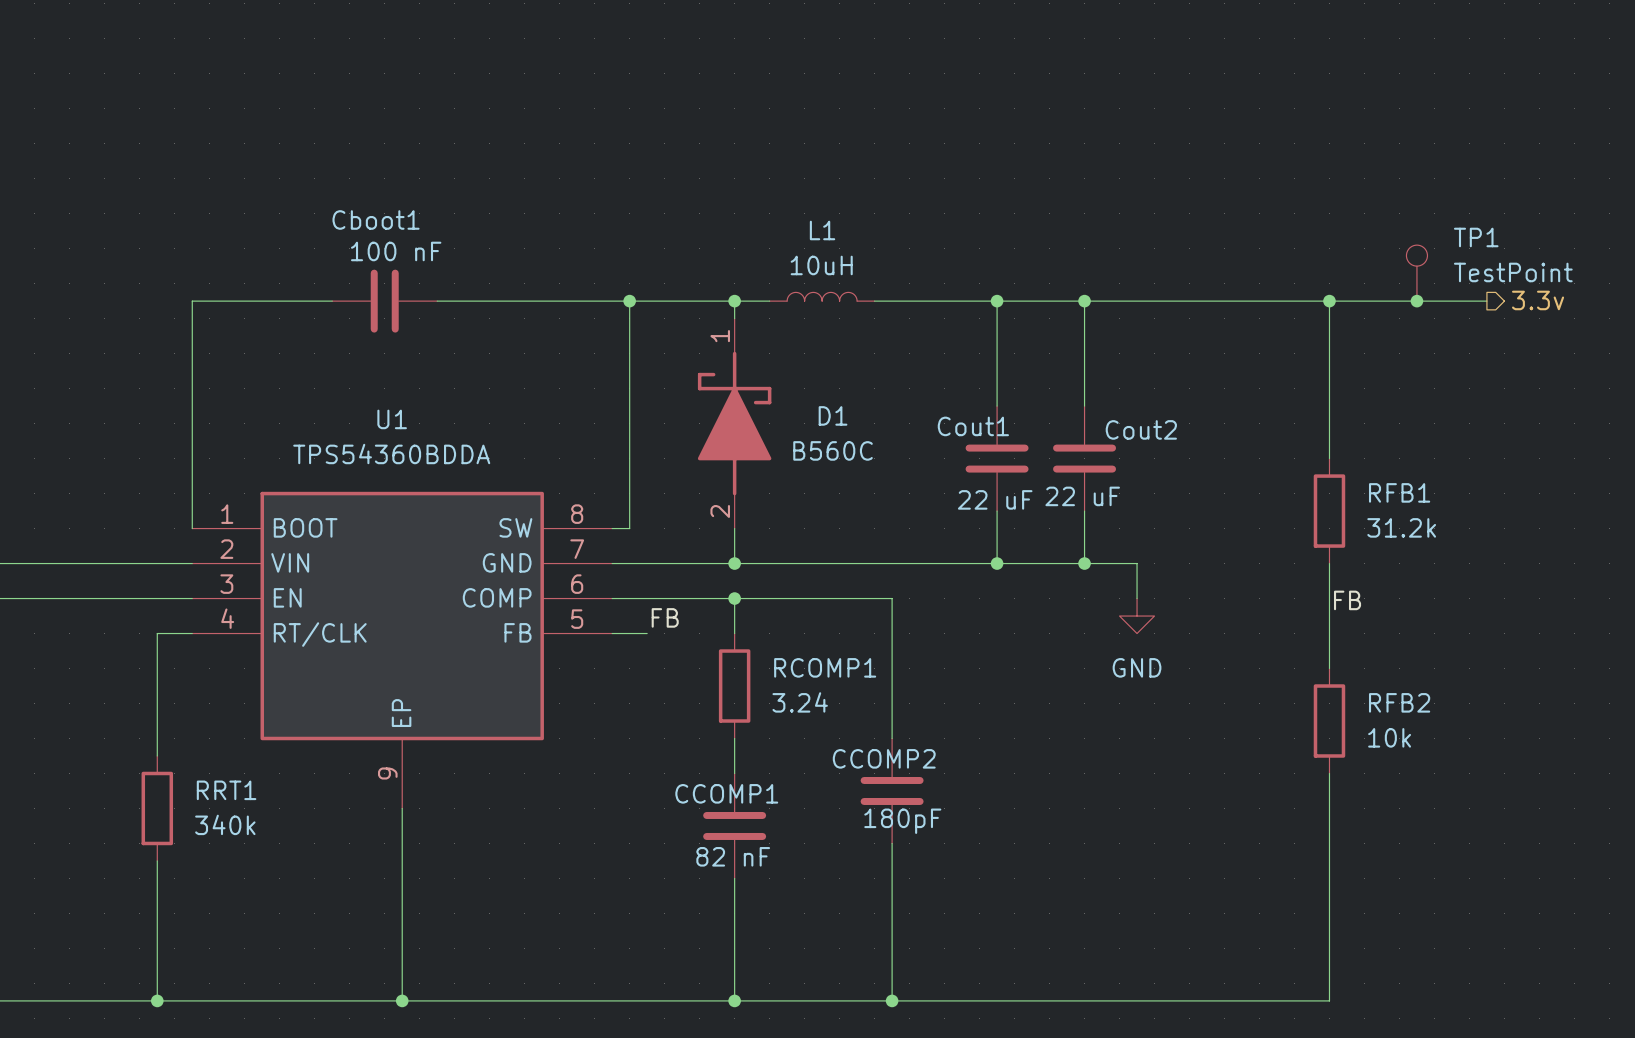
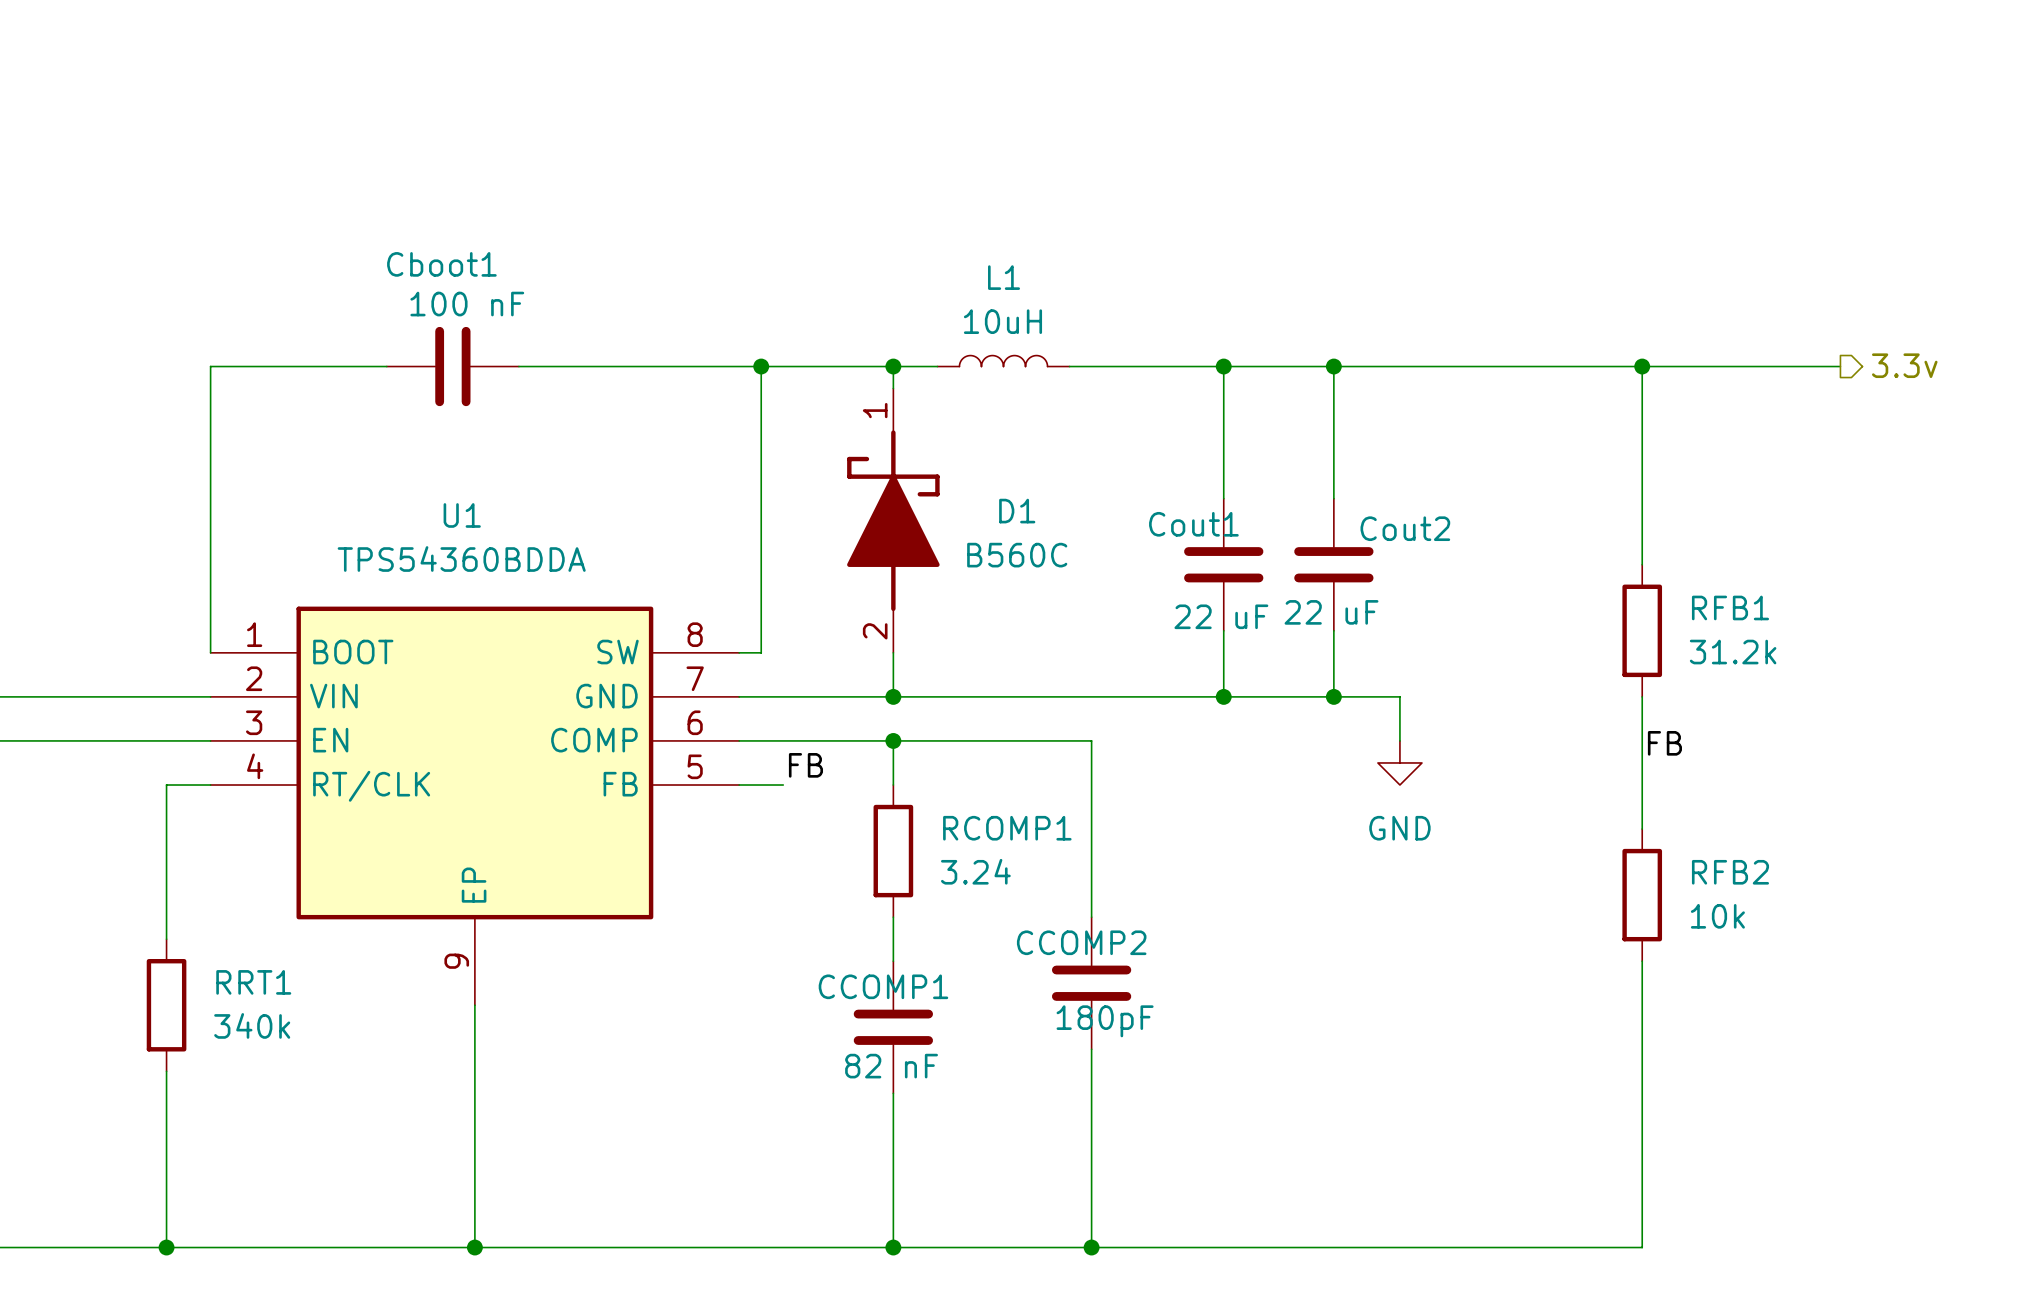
TP1: TestPoint (1416, 273) -> none
junction: (1416, 301) -> none

